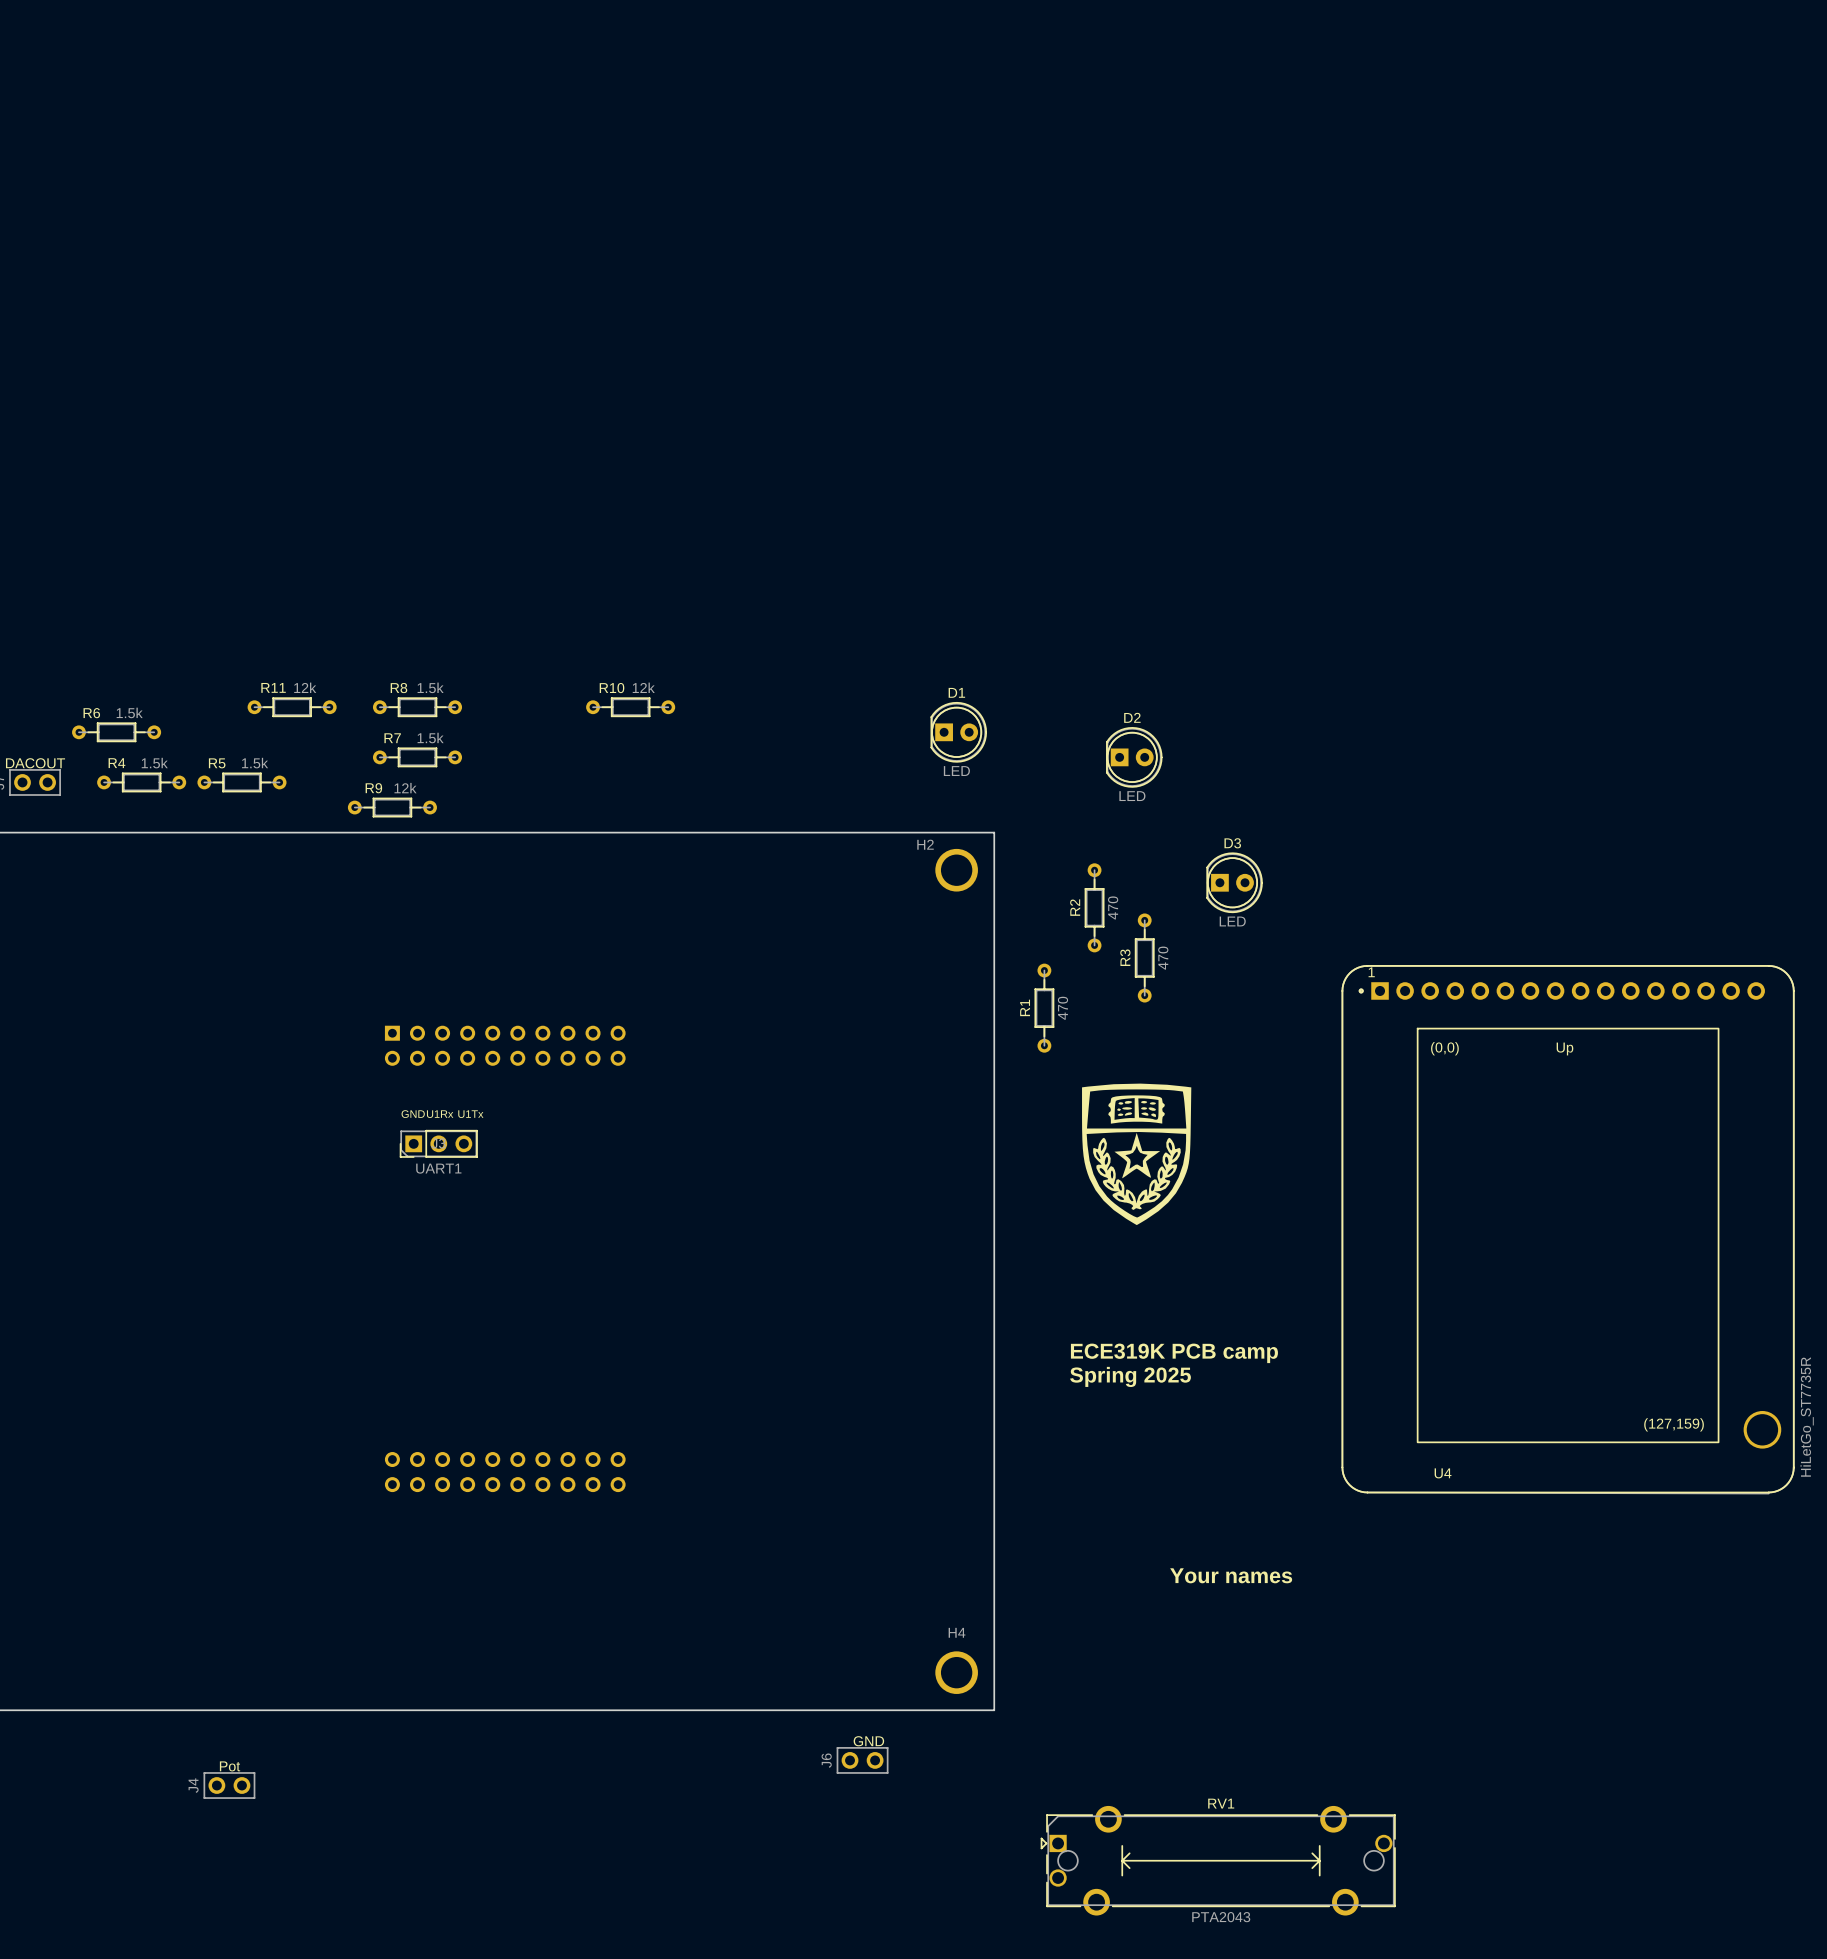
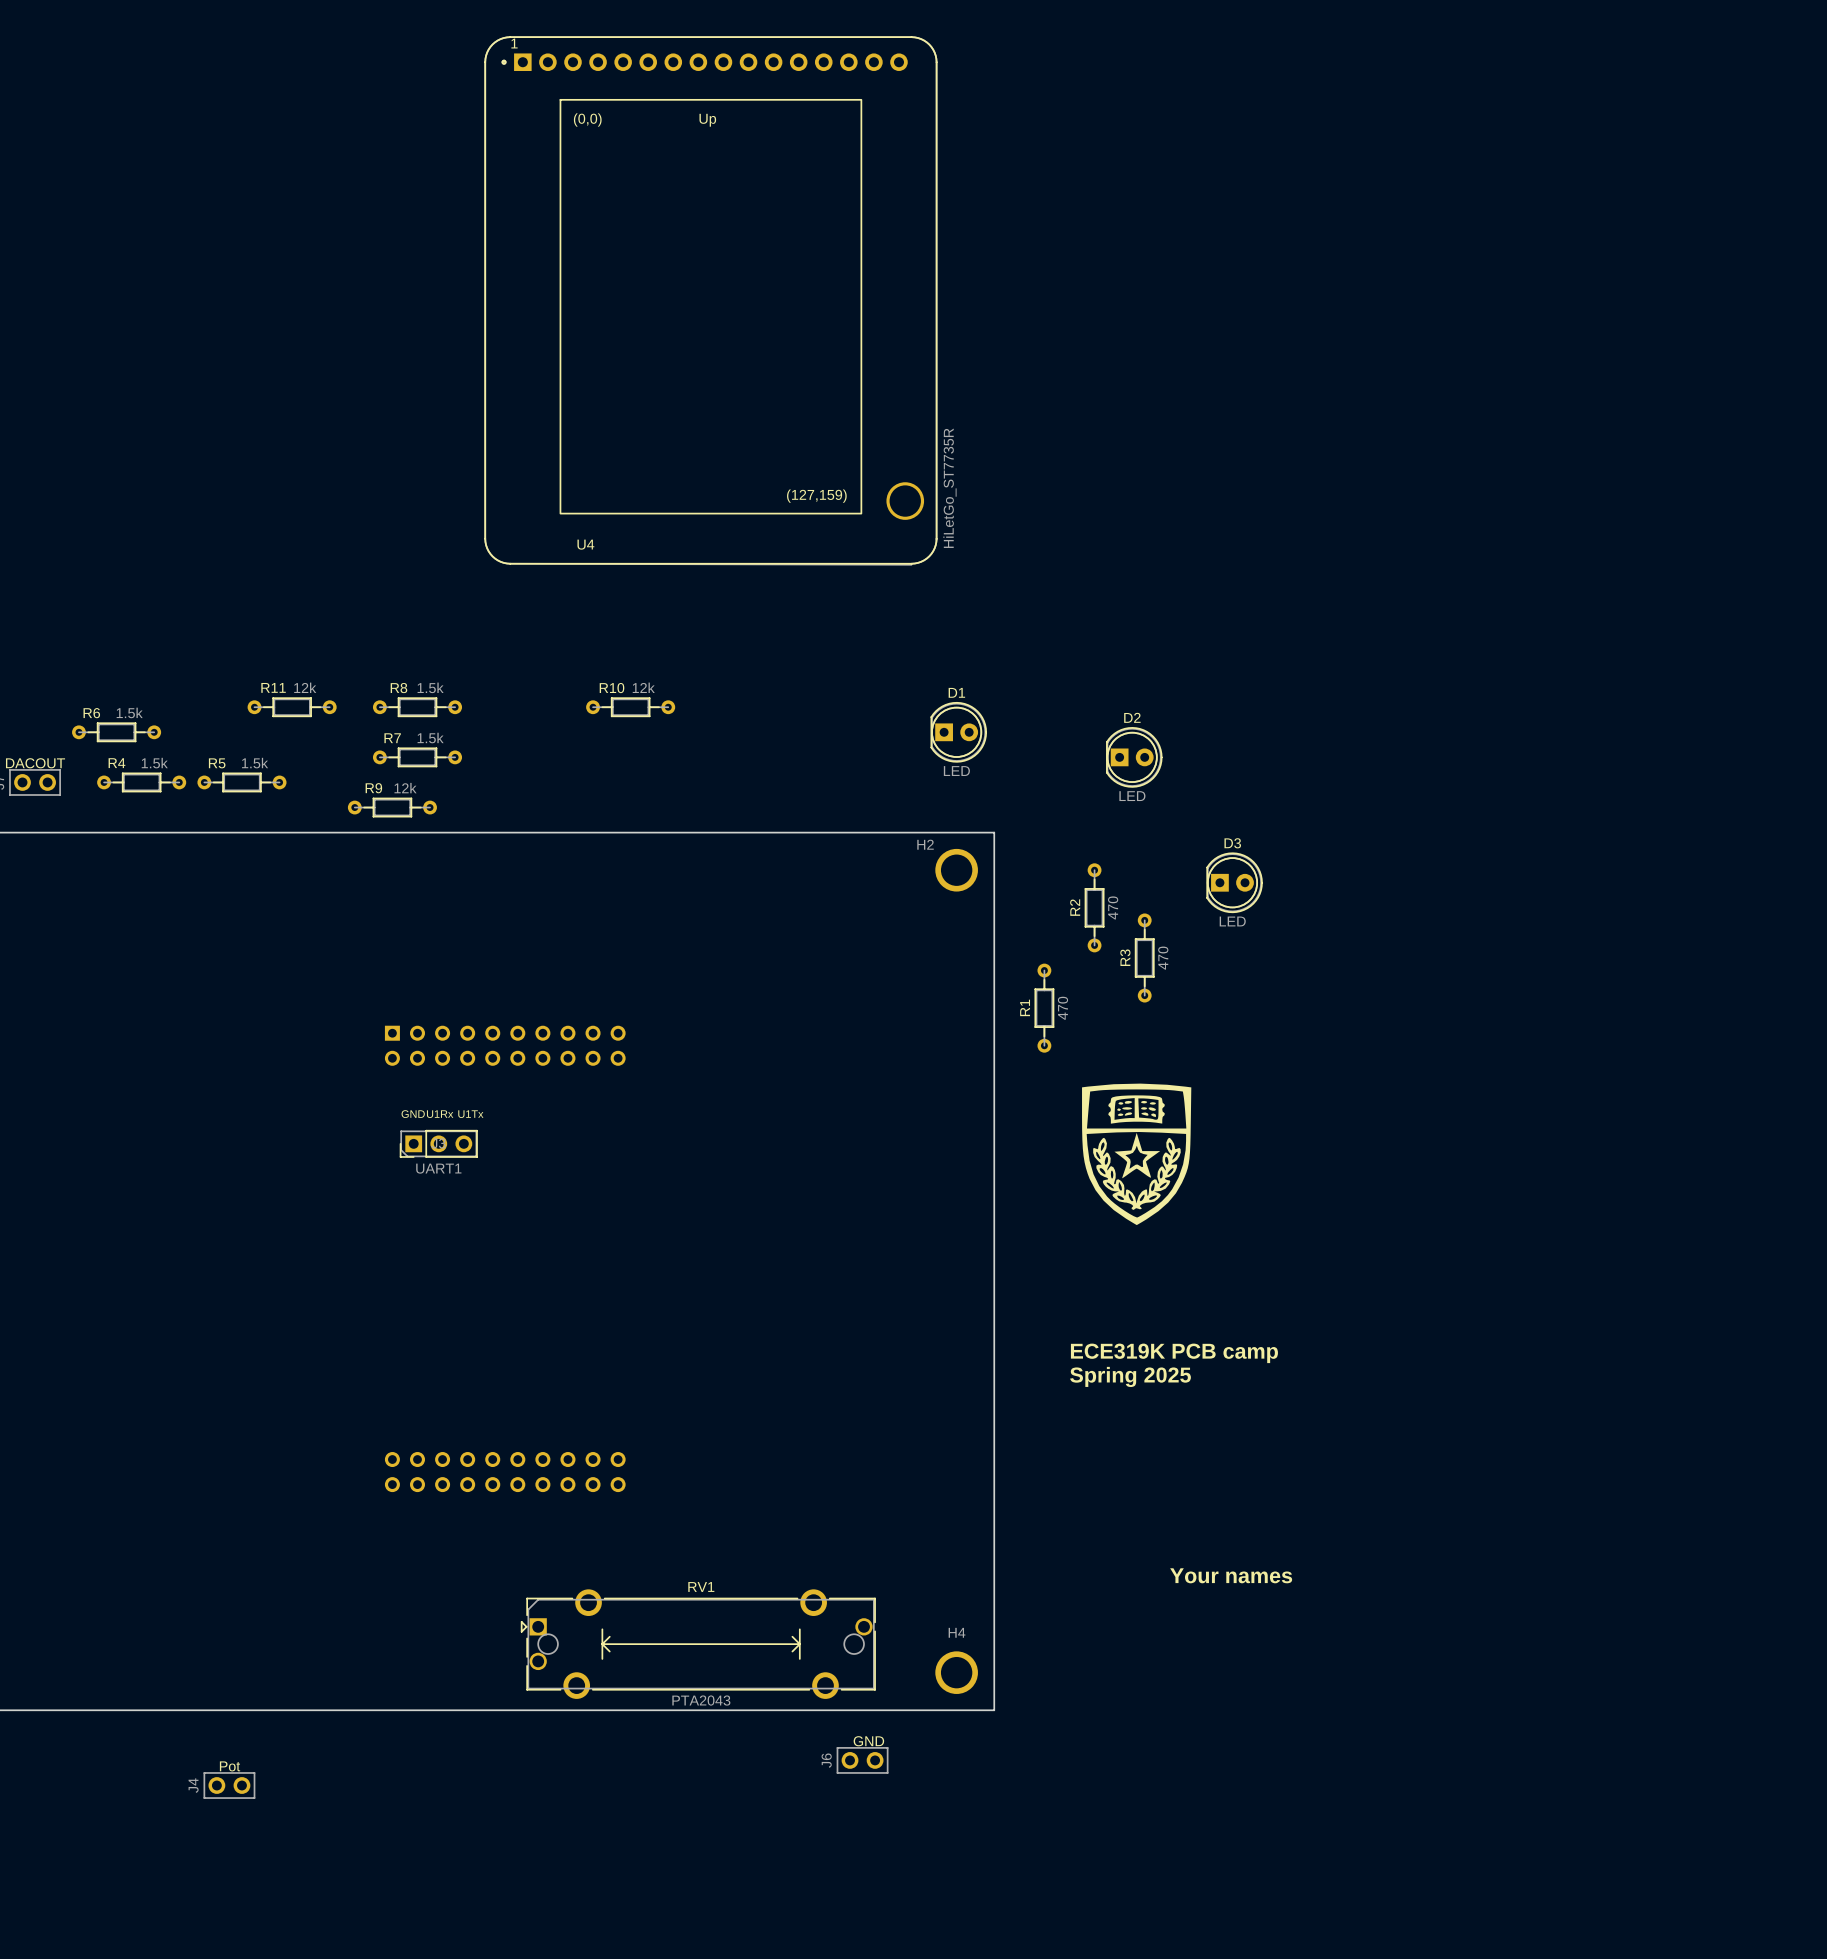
U4 position: (1568, 1229) -> (710, 300)
RV1 position: (1218, 1860) -> (698, 1644)

